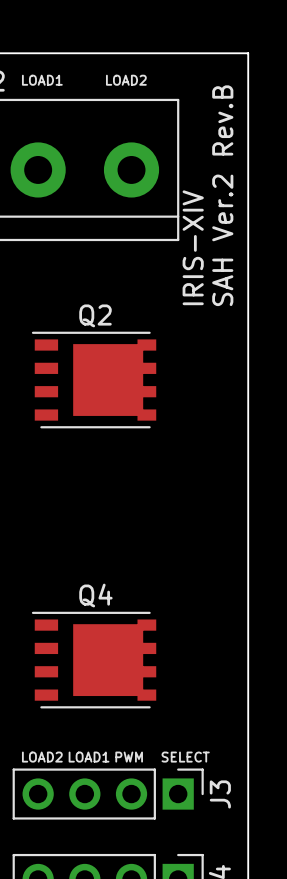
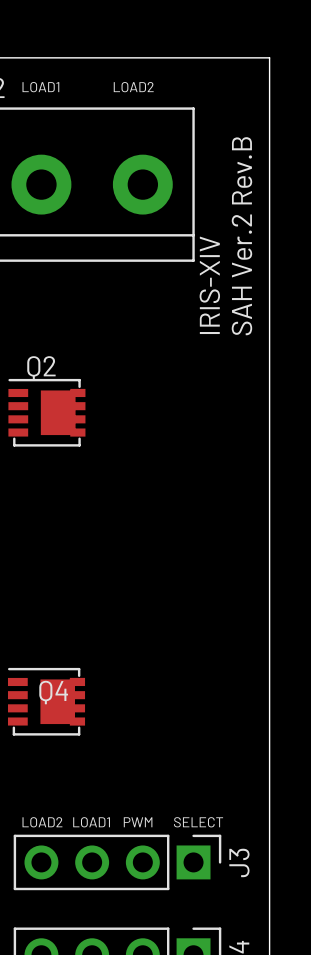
Q2 footprint: [31, 331, 157, 429] -> [8, 378, 86, 447]
Q4 name position: Q4 (95, 595) -> Q4 (53, 692)
Q4 footprint: [31, 611, 157, 709] -> [7, 667, 86, 736]

